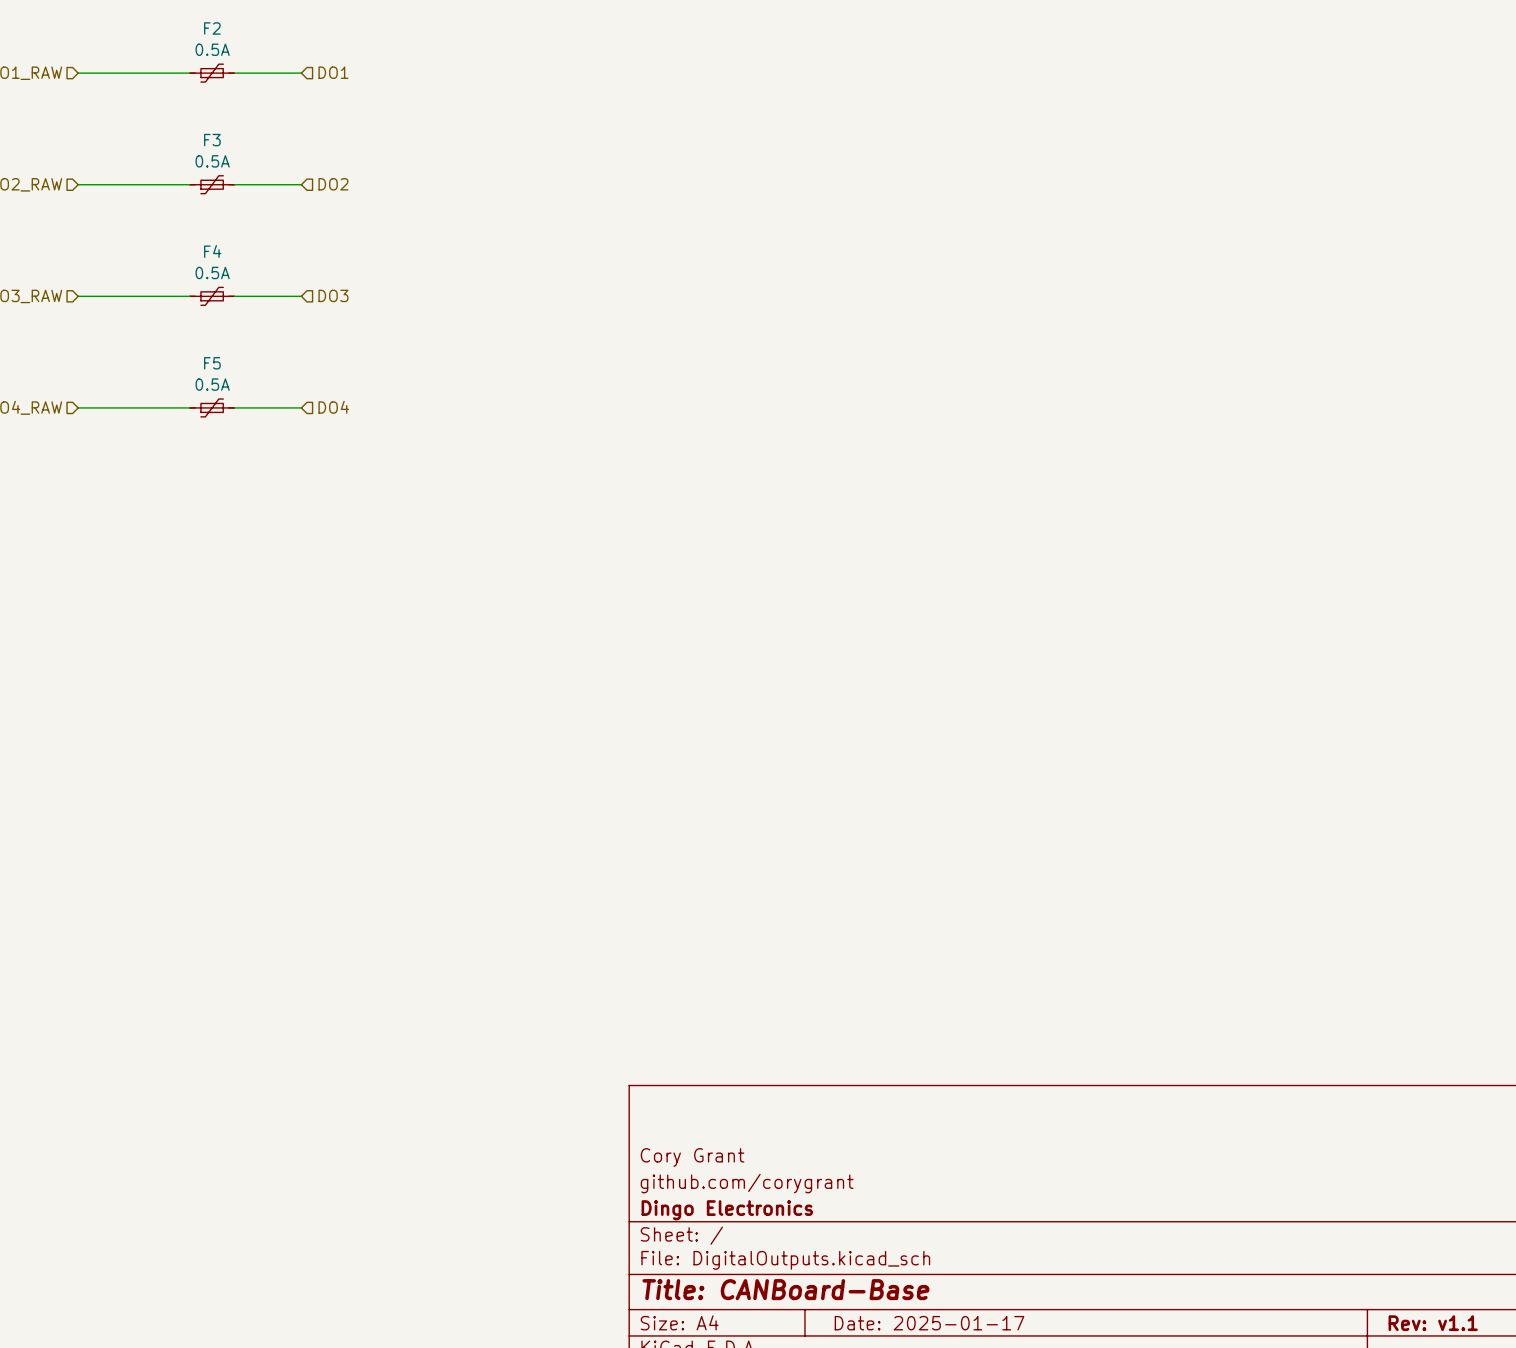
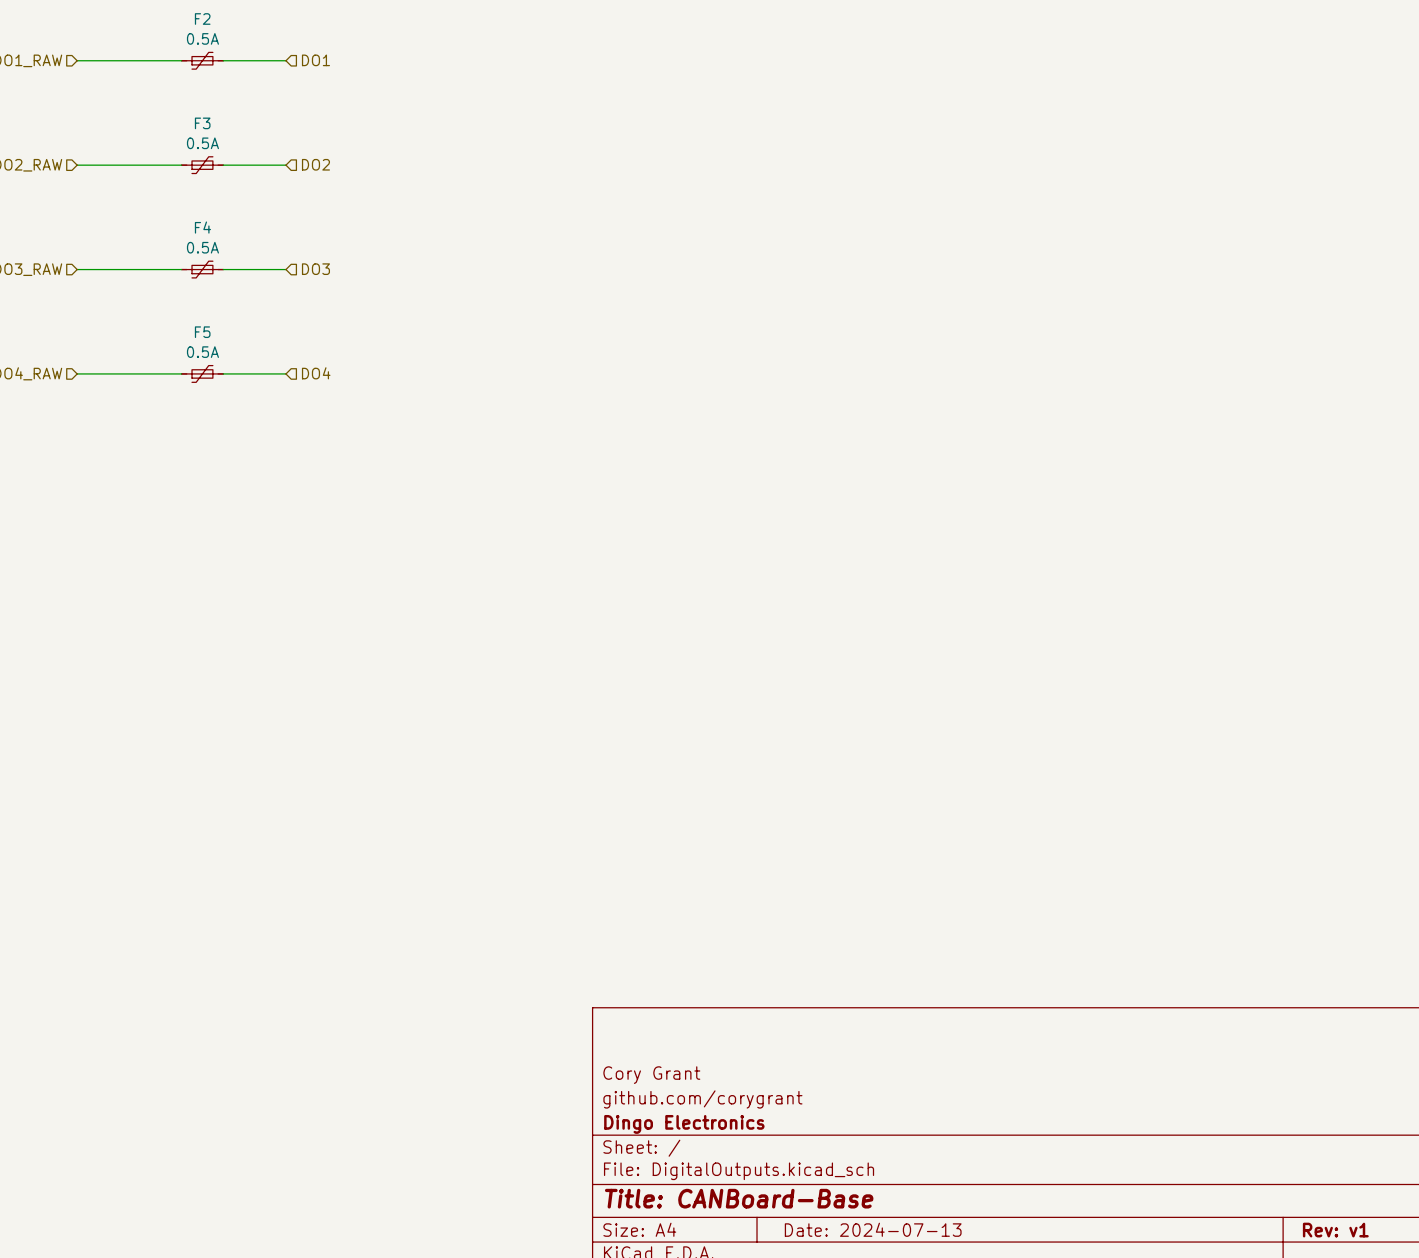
title block: Date: 2025-01-17 (929, 1323) -> Date: 2024-07-13 (873, 1229)
title block: Rev: v1.1 (1433, 1323) -> Rev: v1 (1335, 1230)

